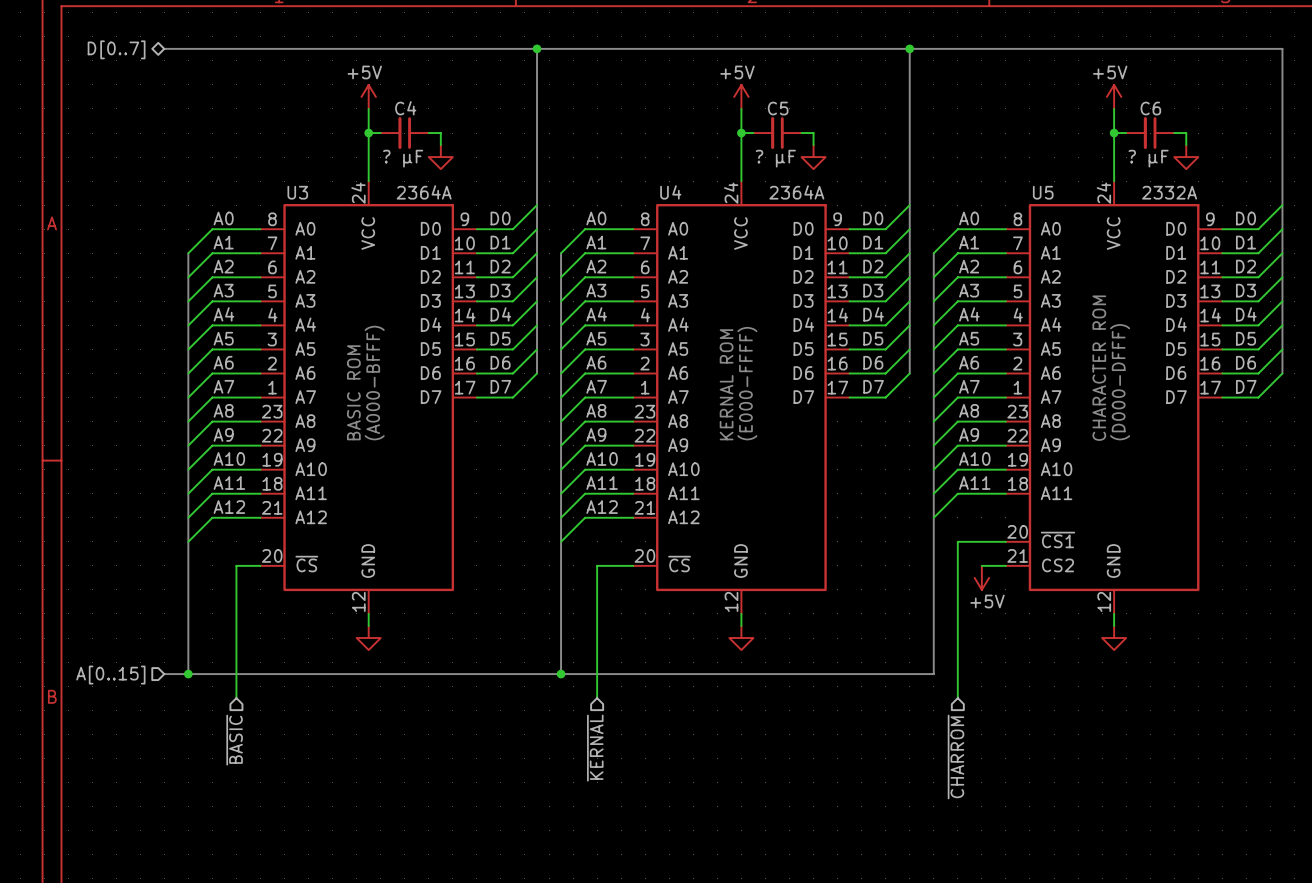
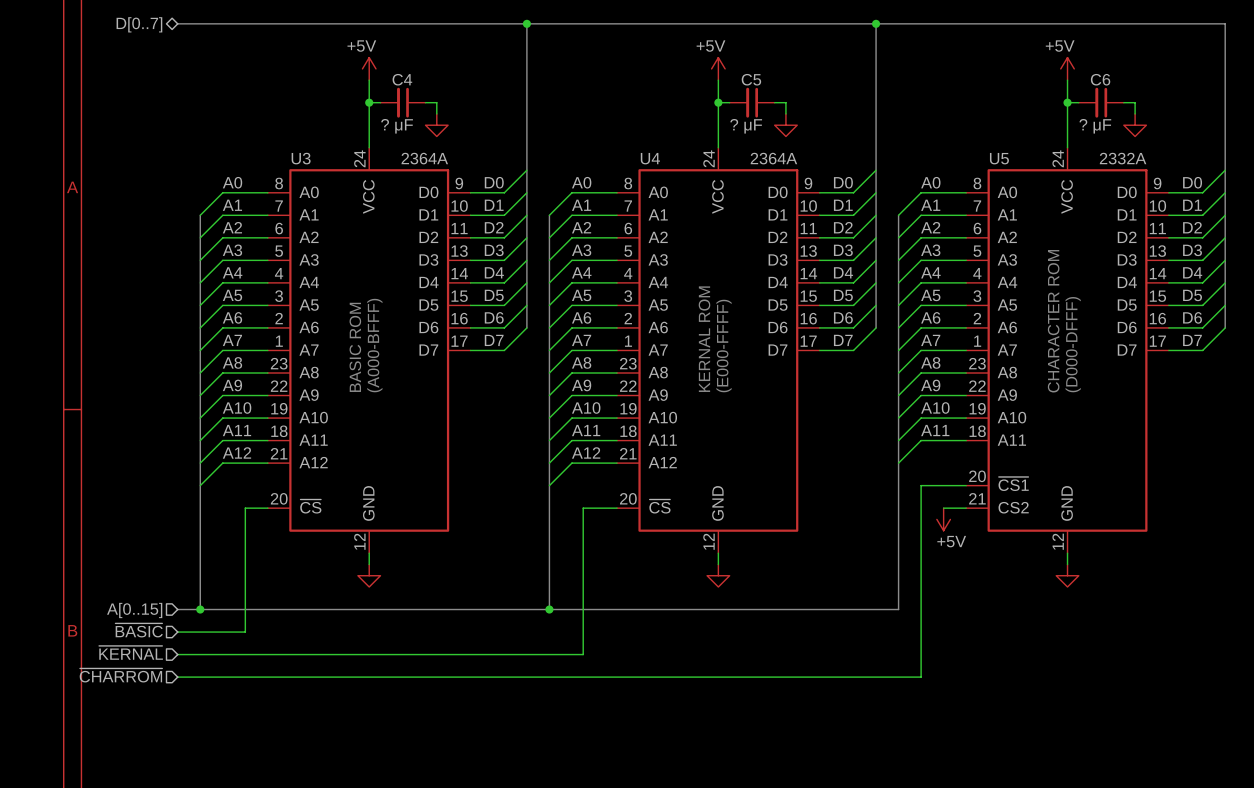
wire: none -> (177, 632) (245, 632)
wire: none -> (583, 632) (583, 654) (177, 654)
wire: none -> (921, 632) (921, 677) (177, 677)
hierarchical label: none -> ~{KERNAL} (130, 652)
hierarchical label rotation: 0° (234, 740) -> 90° clockwise (139, 630)
hierarchical label position: ~{BASIC} (234, 740) -> ~{BASIC} (139, 630)
hierarchical label: none -> ~{CHARROM} (121, 675)
hierarchical label: ~{KERNAL} (595, 748) -> none
hierarchical label: ~{CHARROM} (955, 756) -> none

